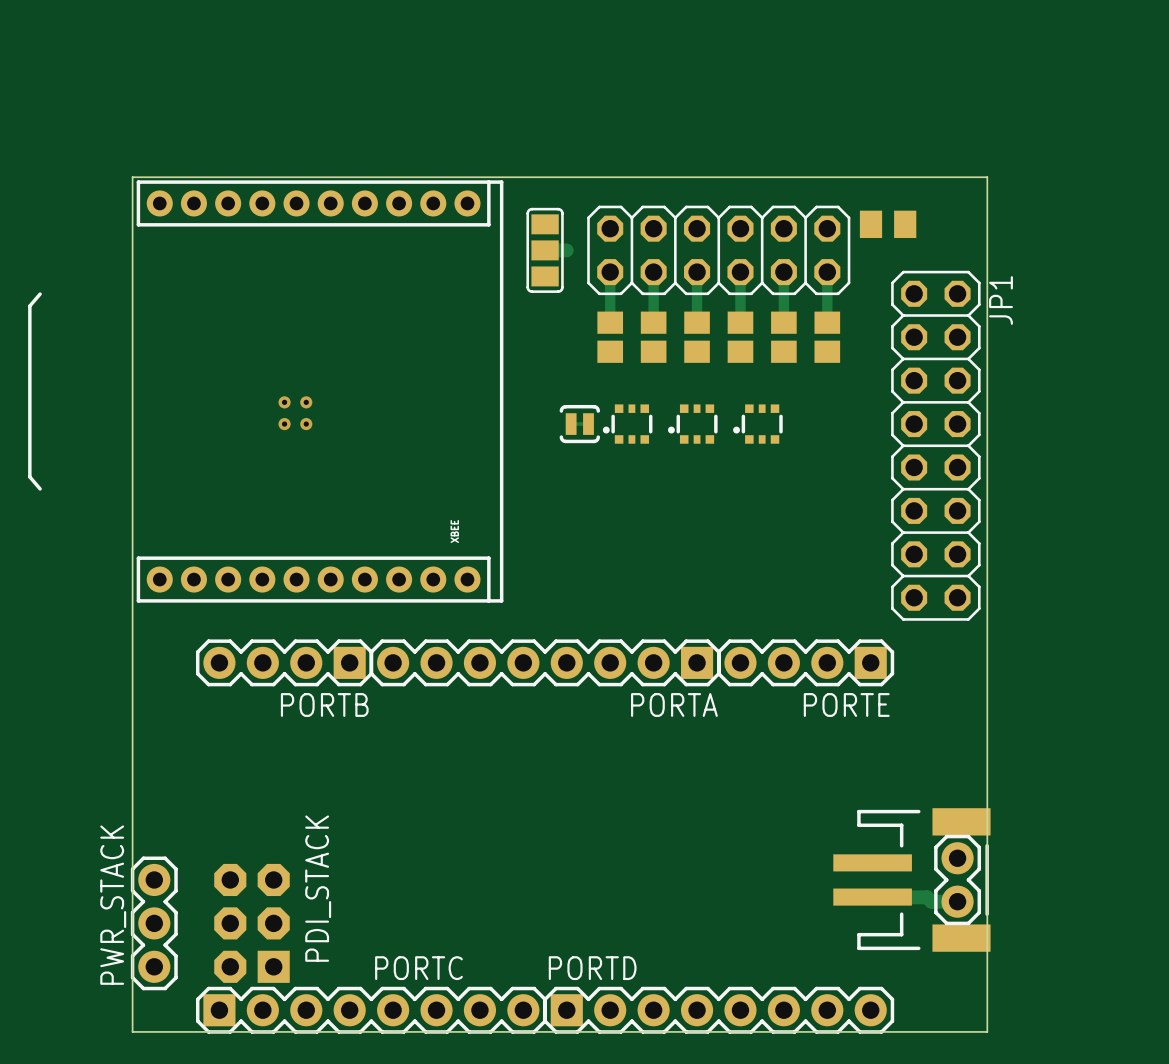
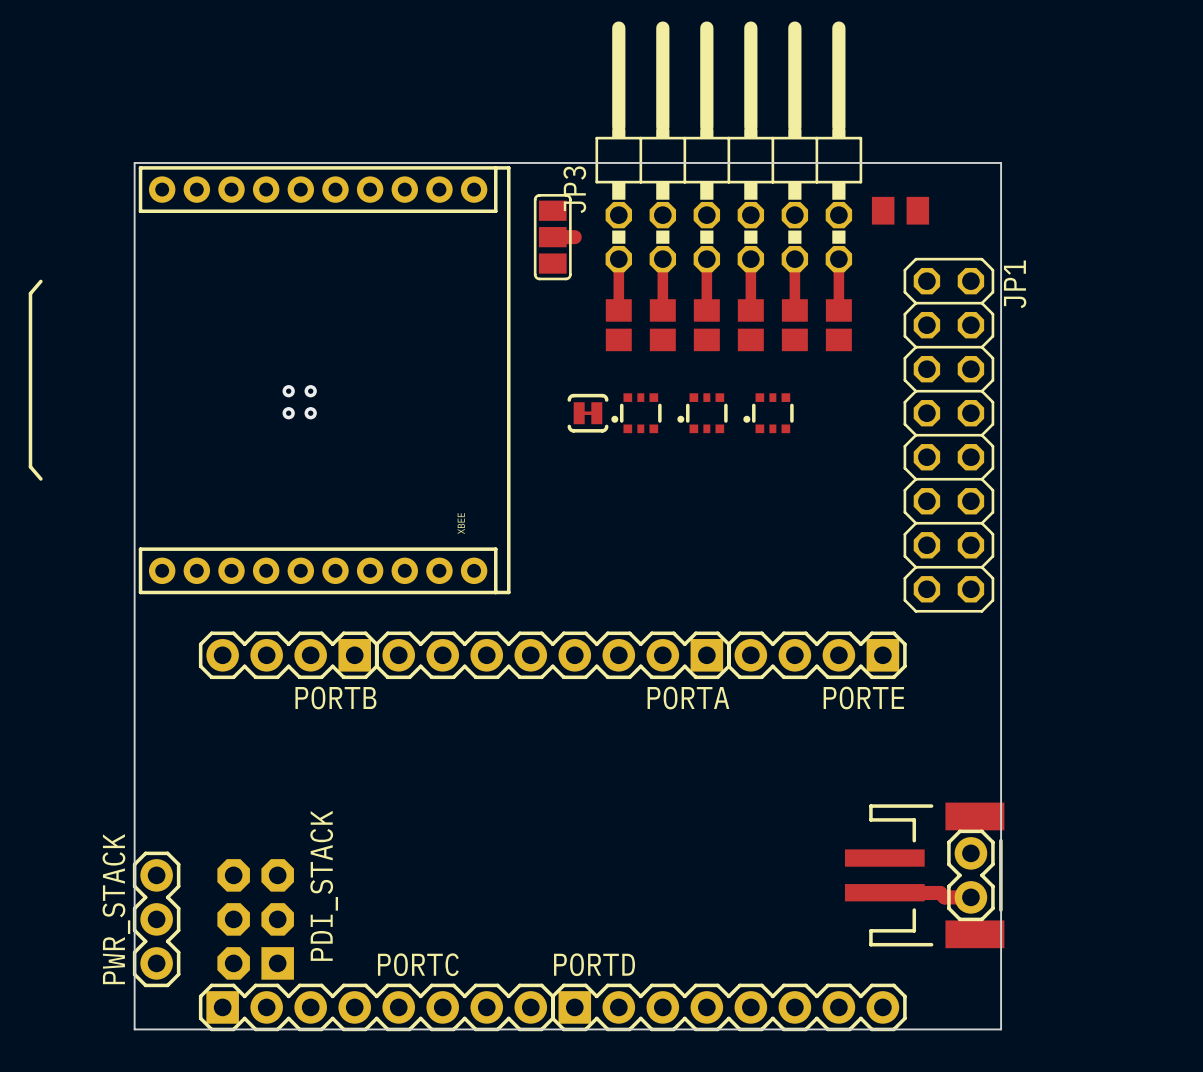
JP3: none -> (728, 146)
part: (718, 250) -> none

